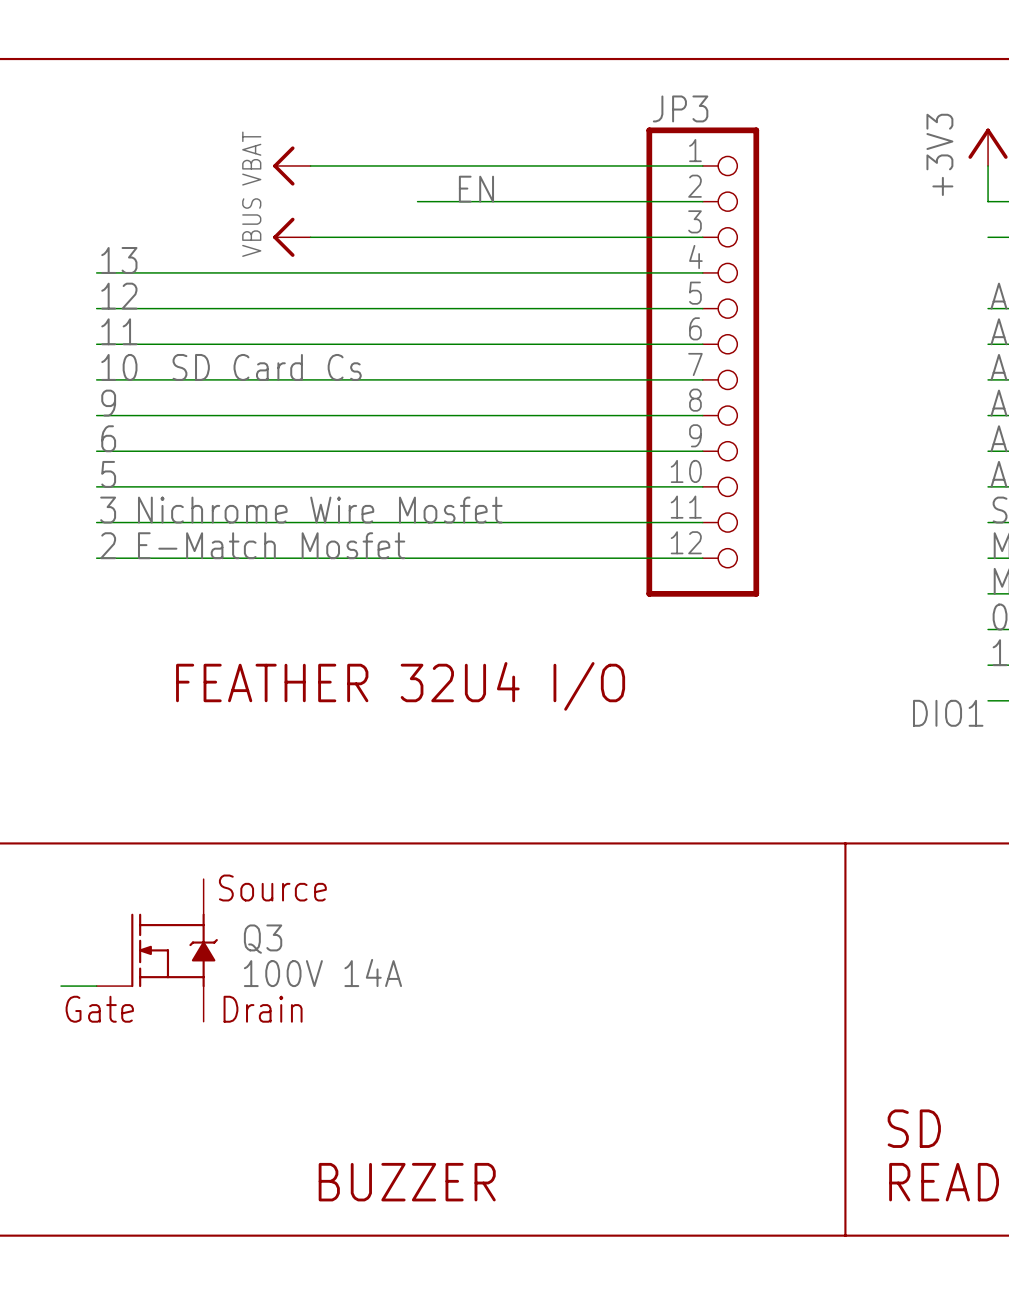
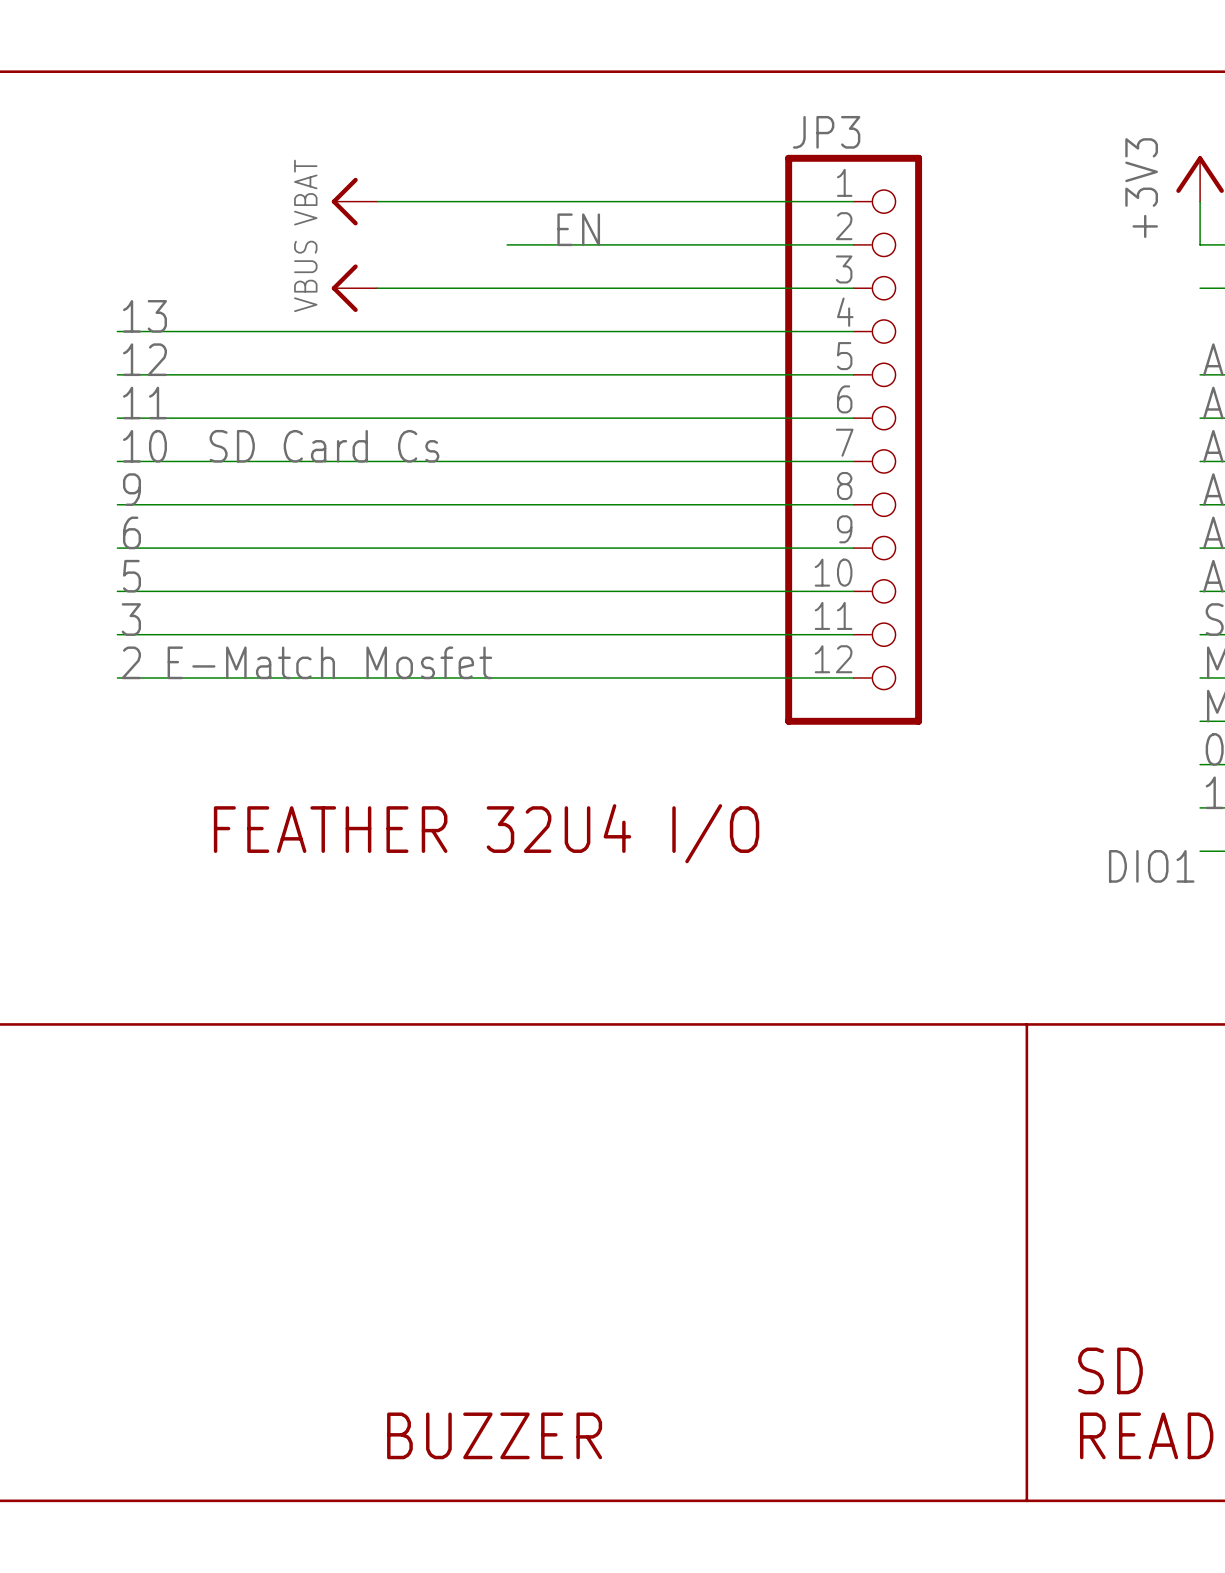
text: Nichrome Wire Mosfet (320, 510) -> none
text: Source (272, 888) -> none
Q3: 100V 14A (157, 950) -> none
wire: (61, 986) (96, 986) -> none
text: Gate (99, 1009) -> none
text: Drain (263, 1009) -> none

